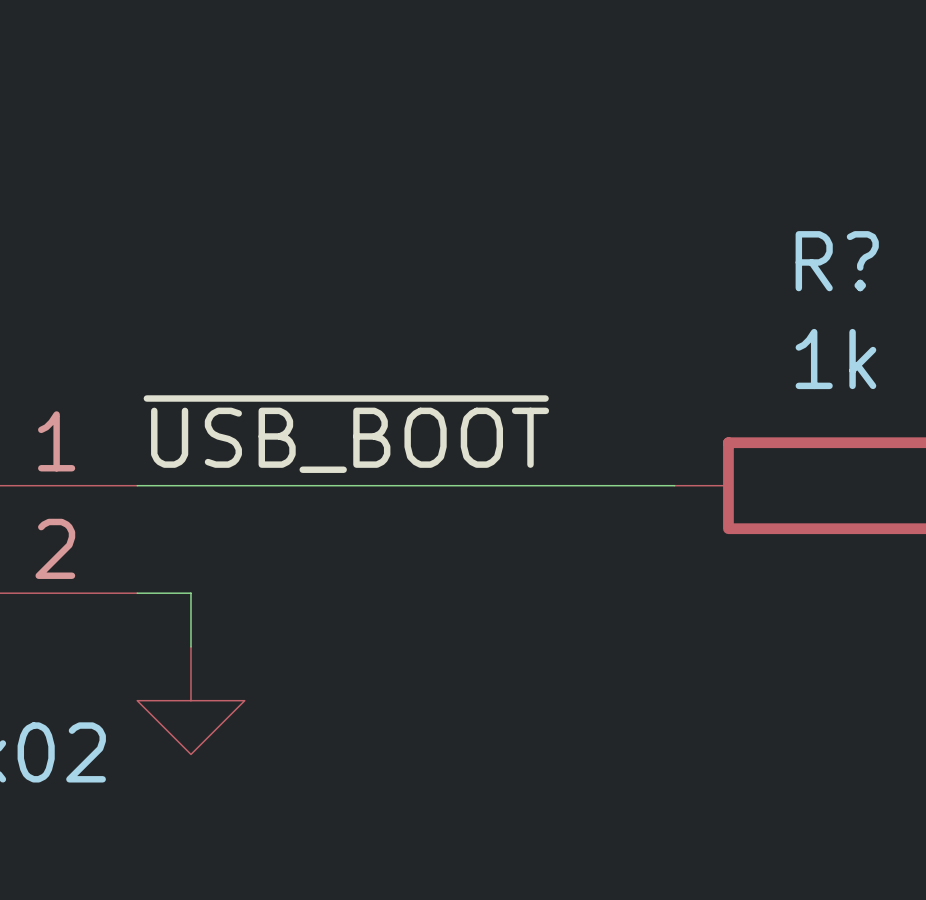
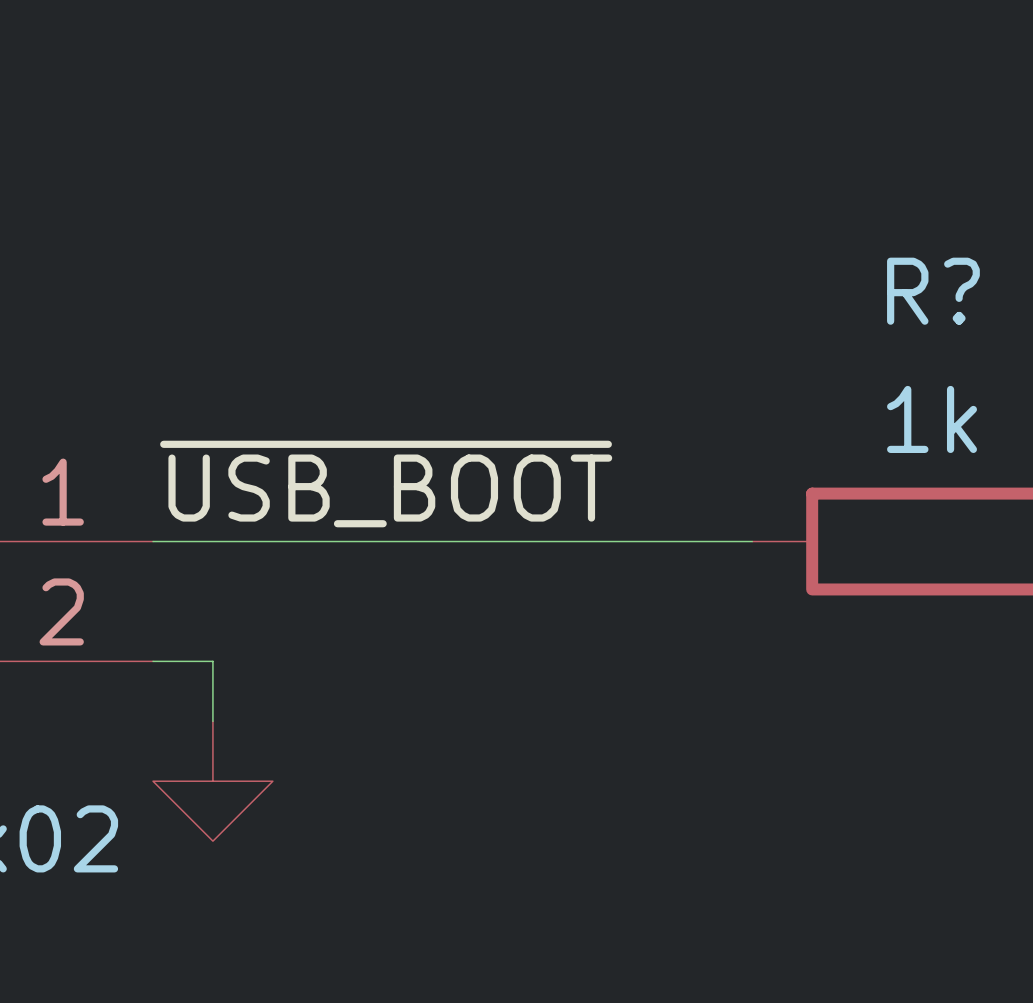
R? value position: 1k (835, 359) -> 1k (932, 419)

